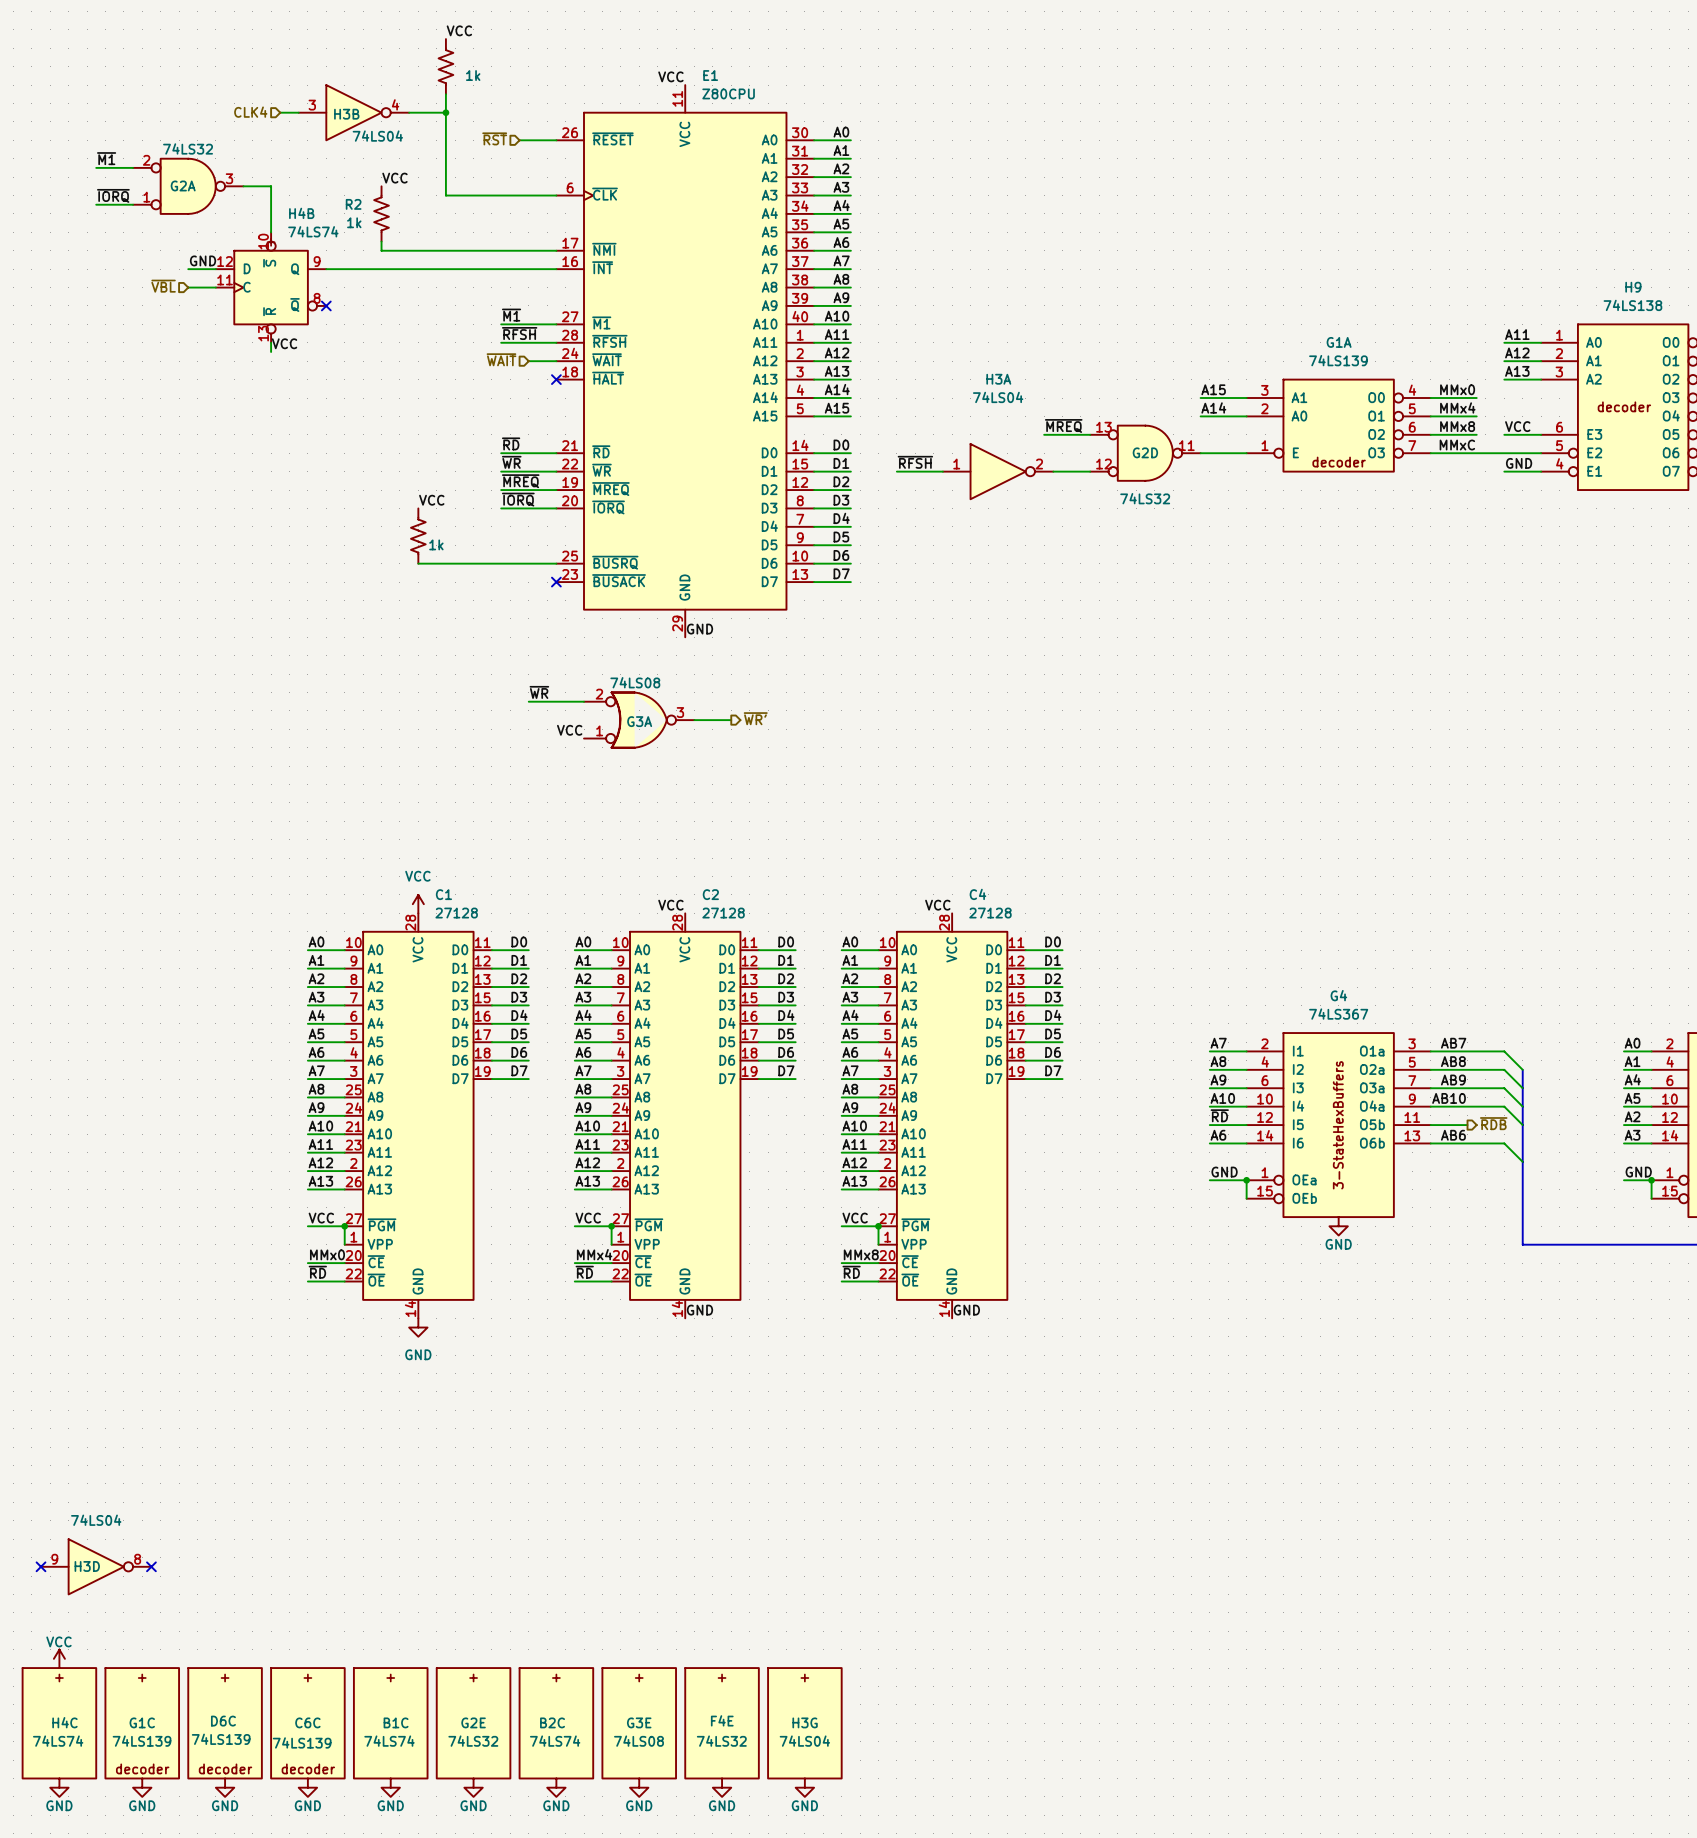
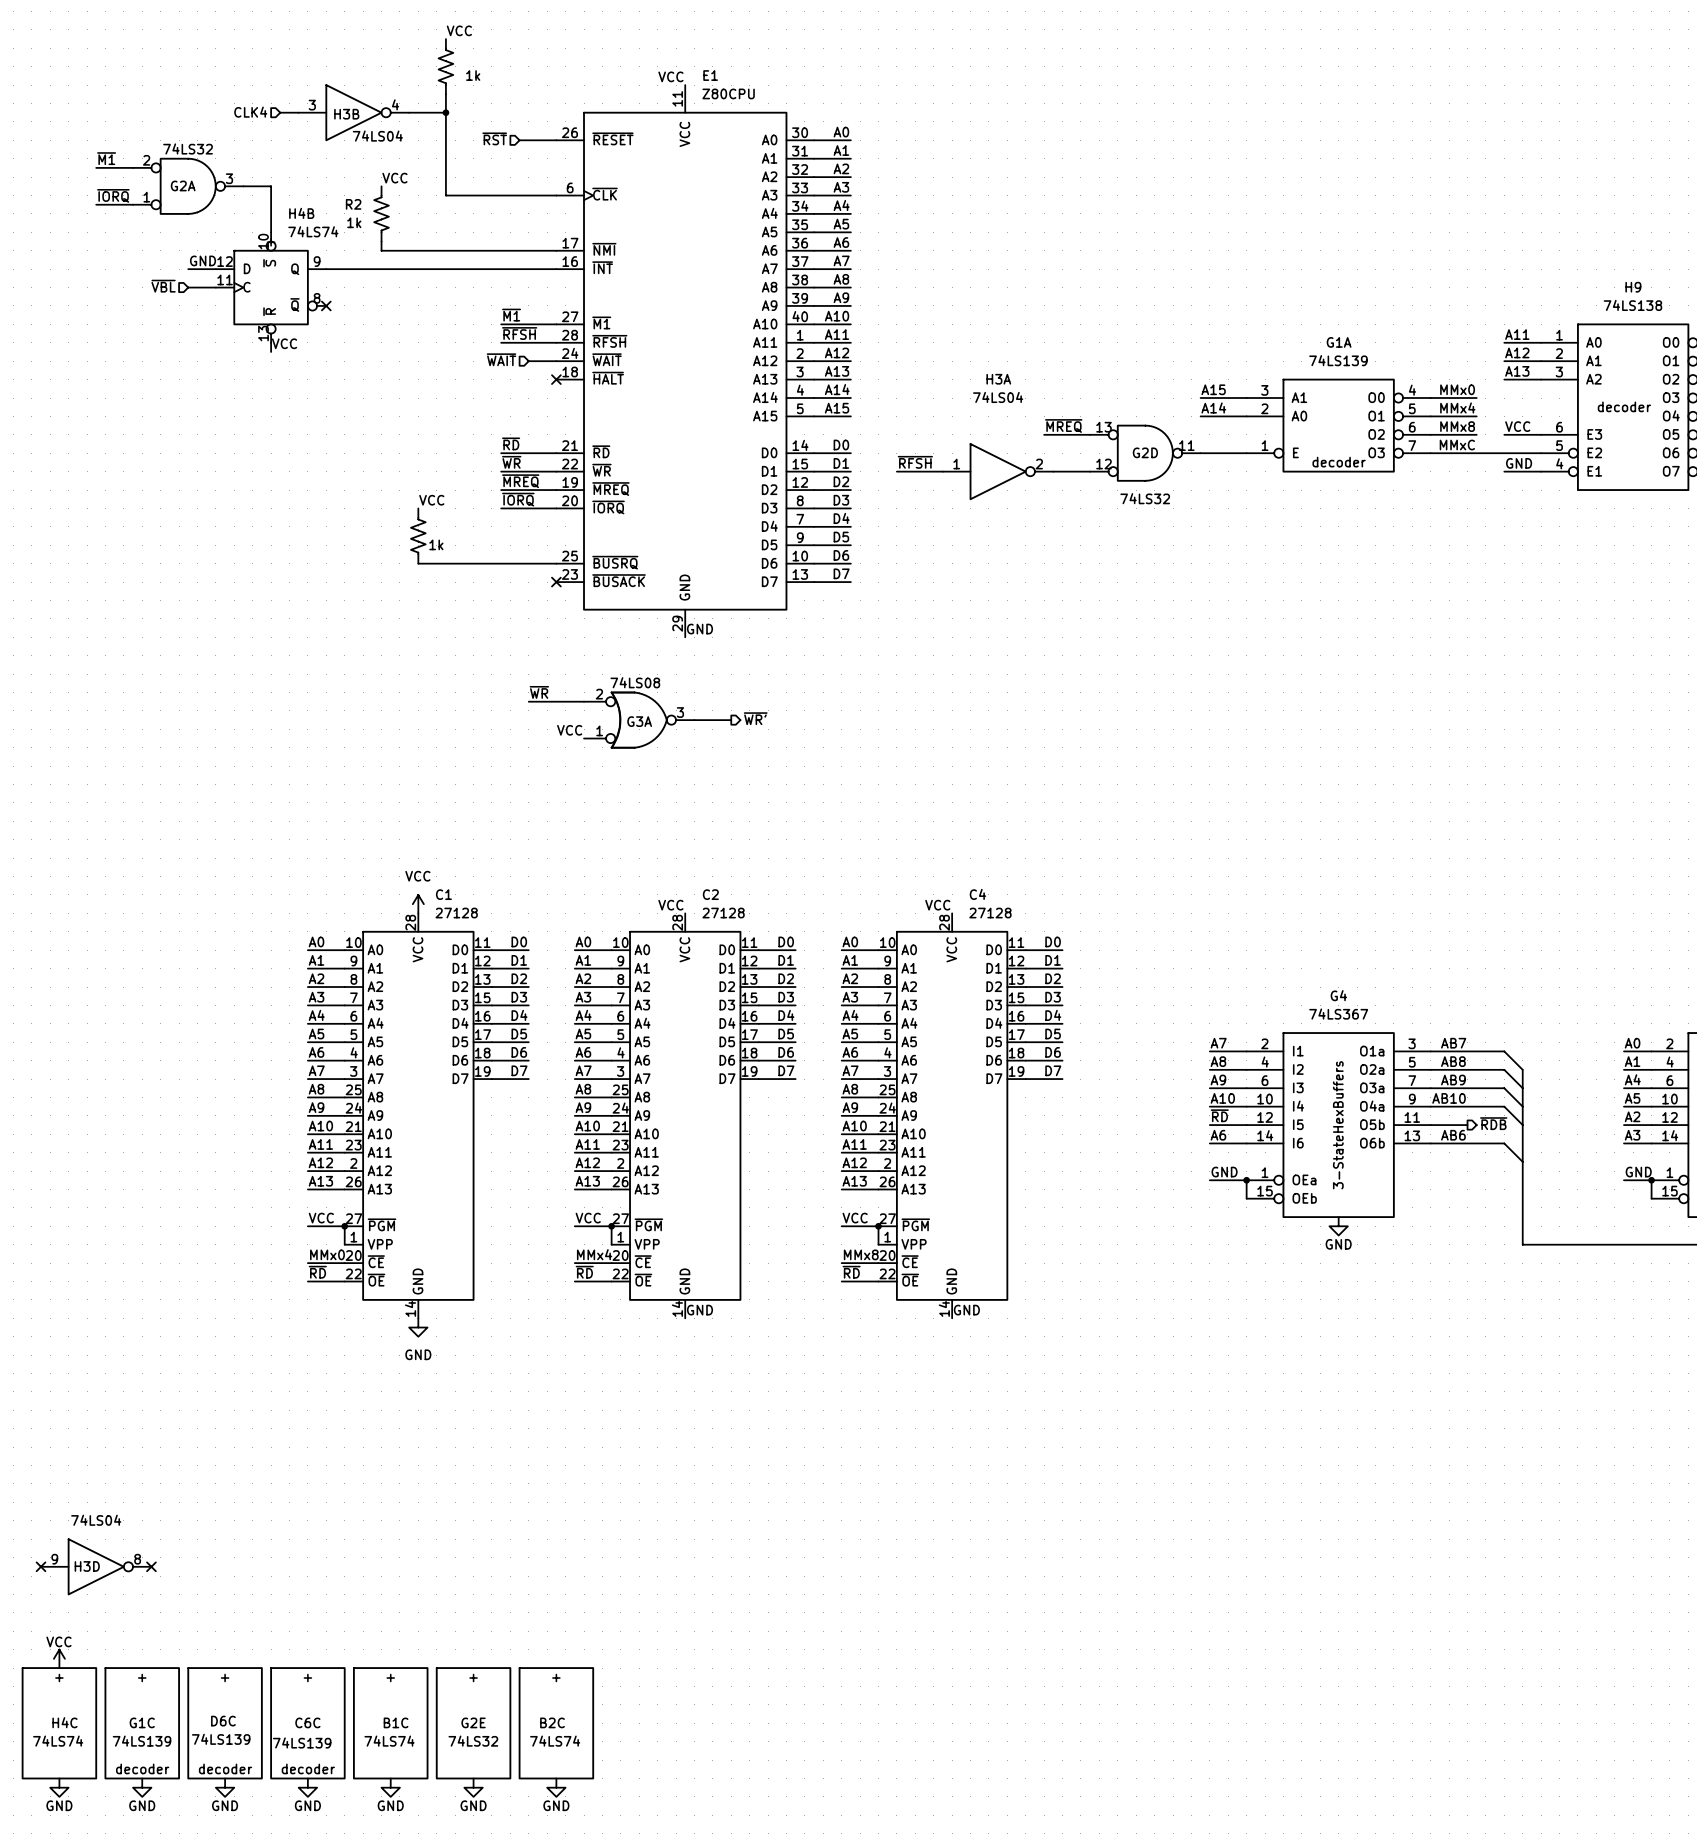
G3E: 74LS08 (639, 1723) -> none
F4E: 74LS32 (722, 1723) -> none
H3G: 74LS04 (804, 1723) -> none
power symbol: GND (639, 1787) -> none
power symbol: GND (722, 1787) -> none
power symbol: GND (804, 1787) -> none

